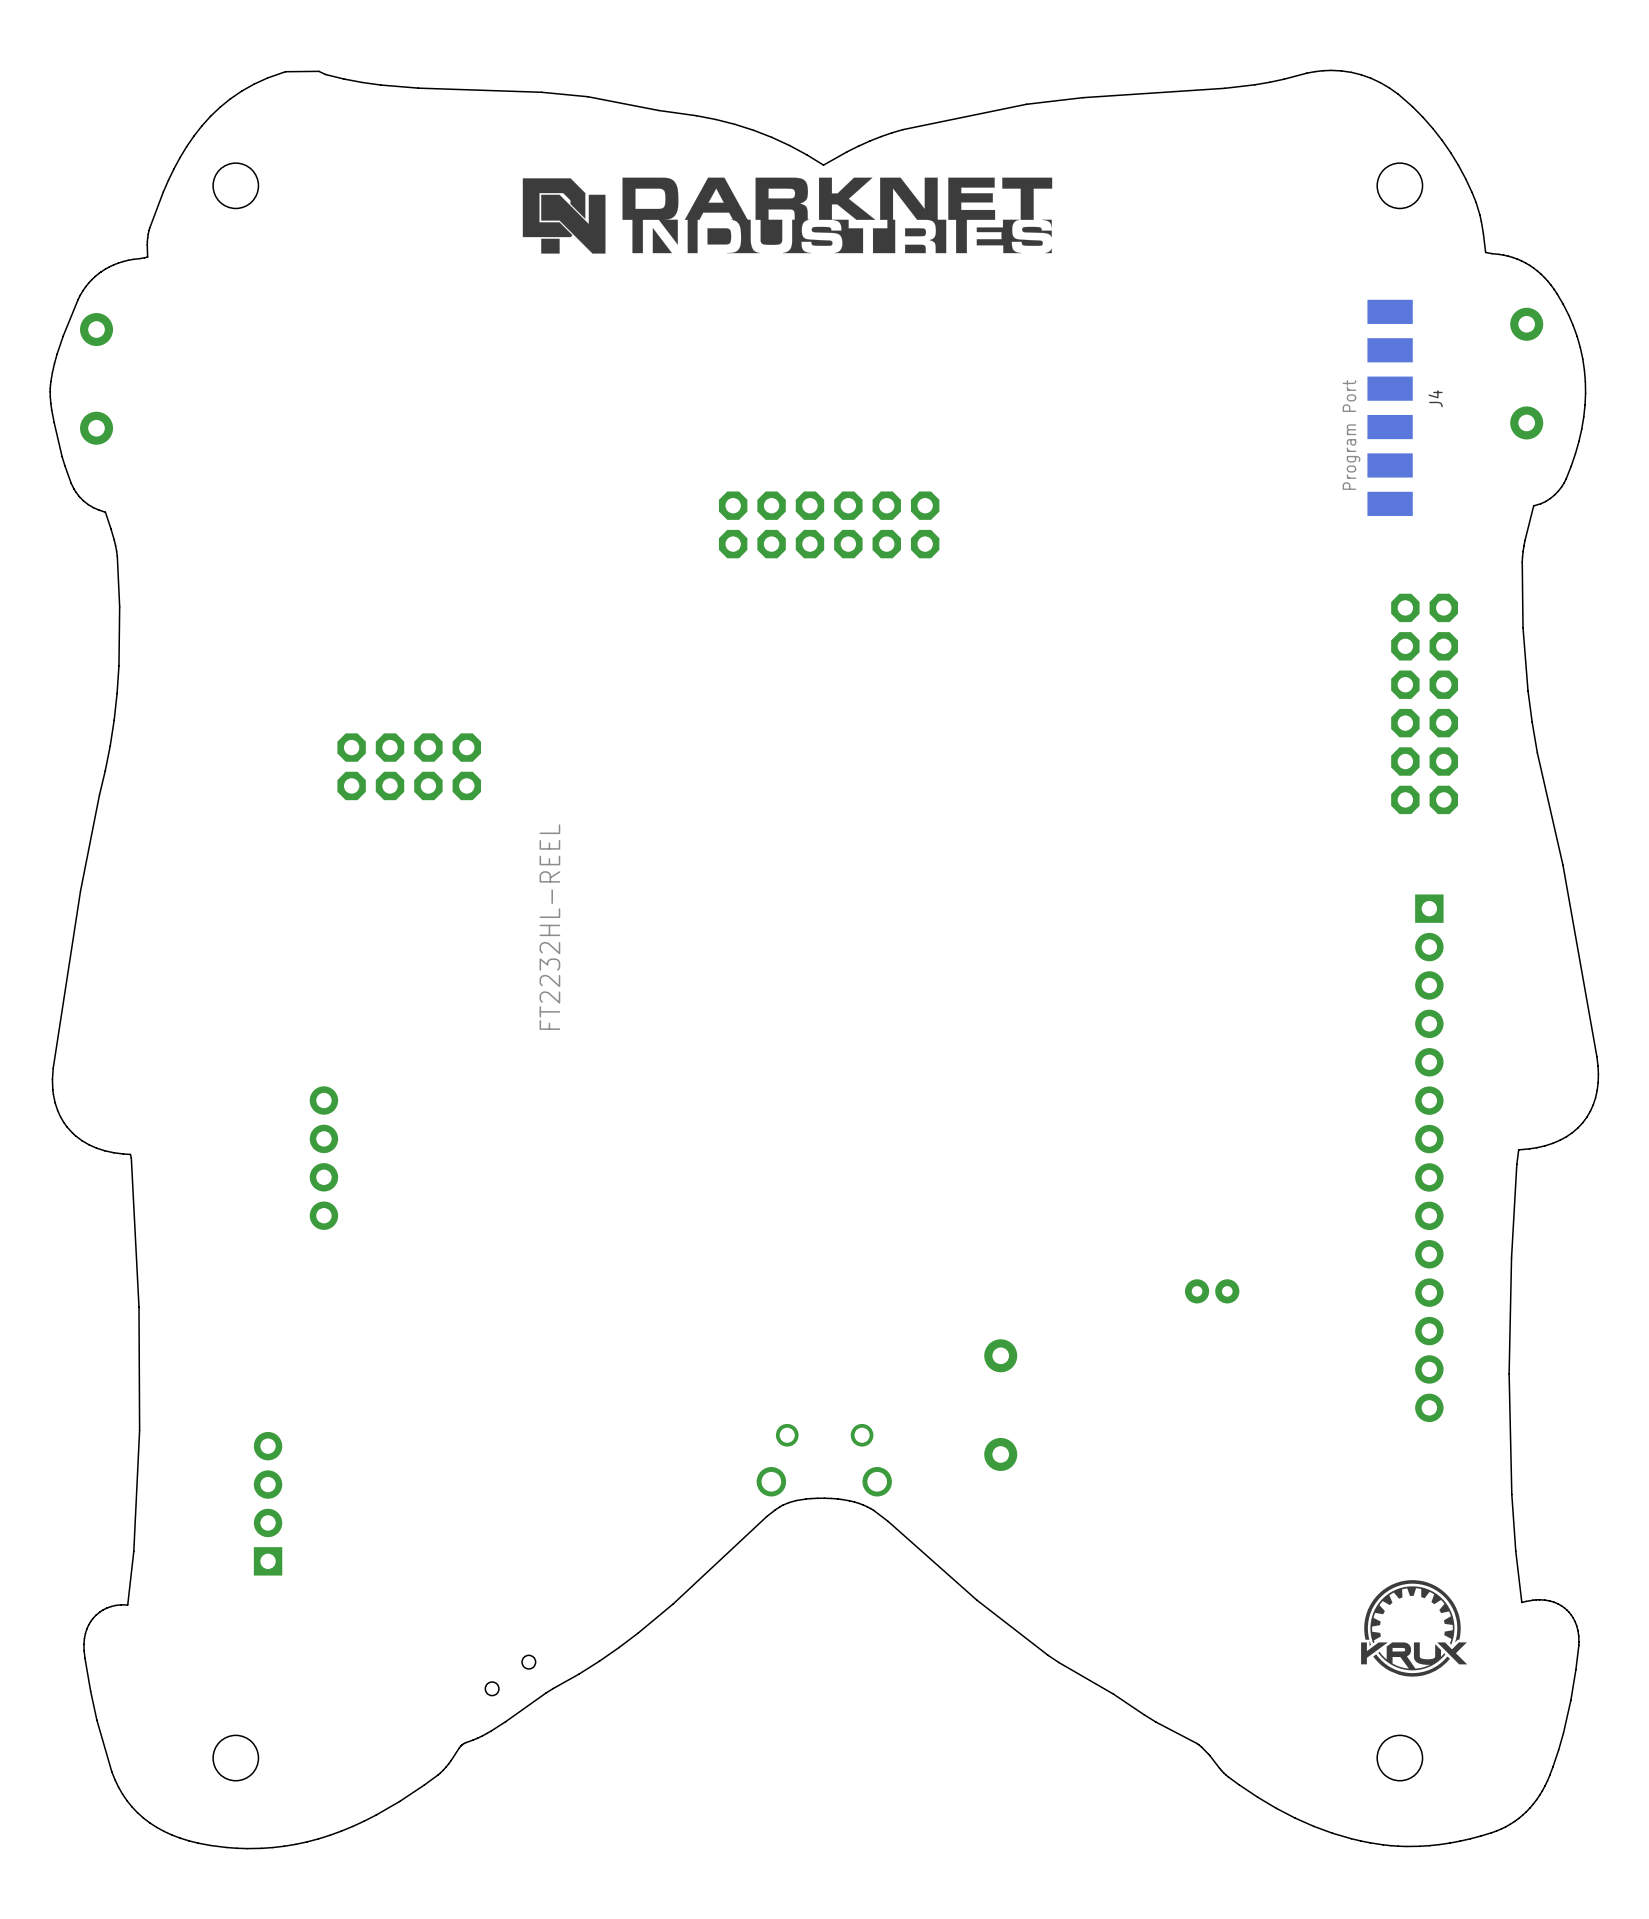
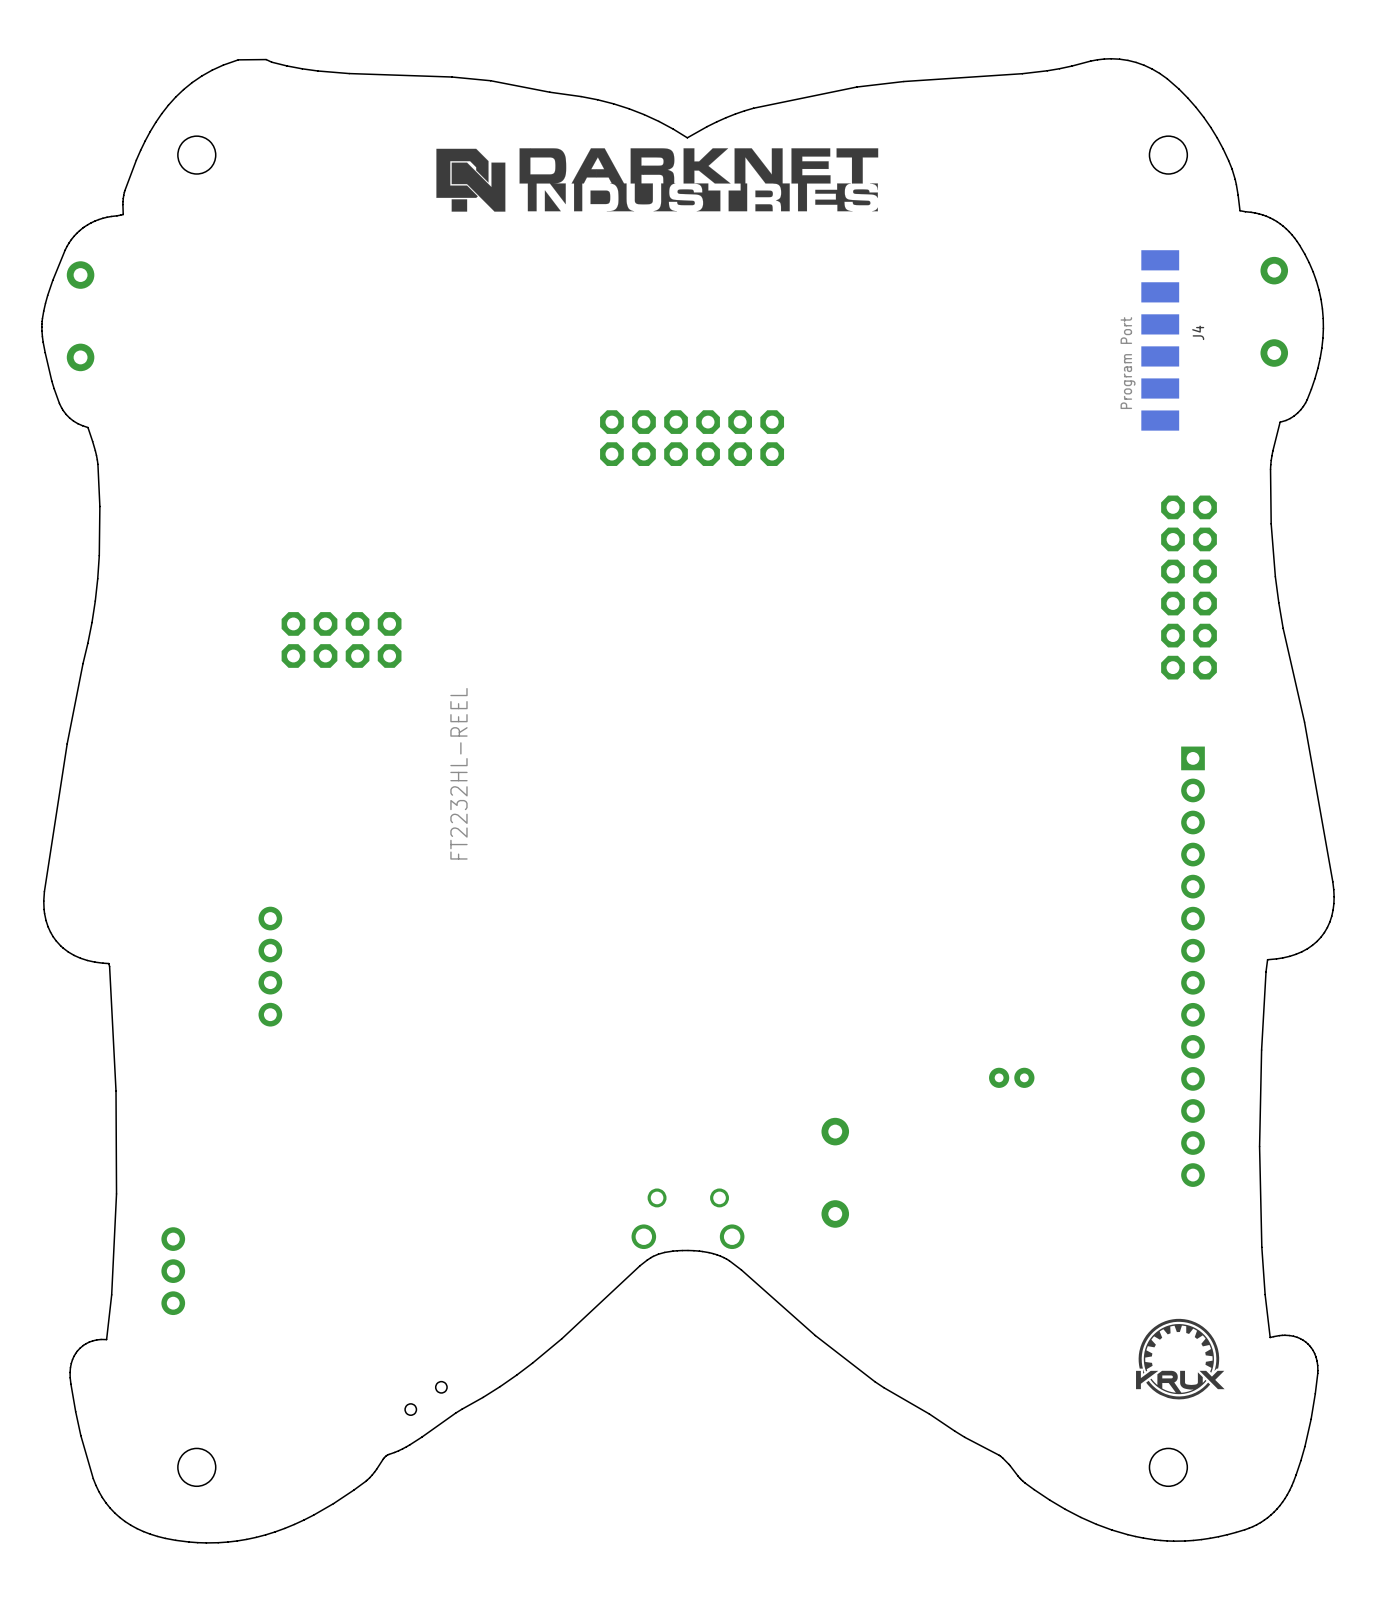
part: (268, 1503) -> none
part: none -> (173, 1271)

